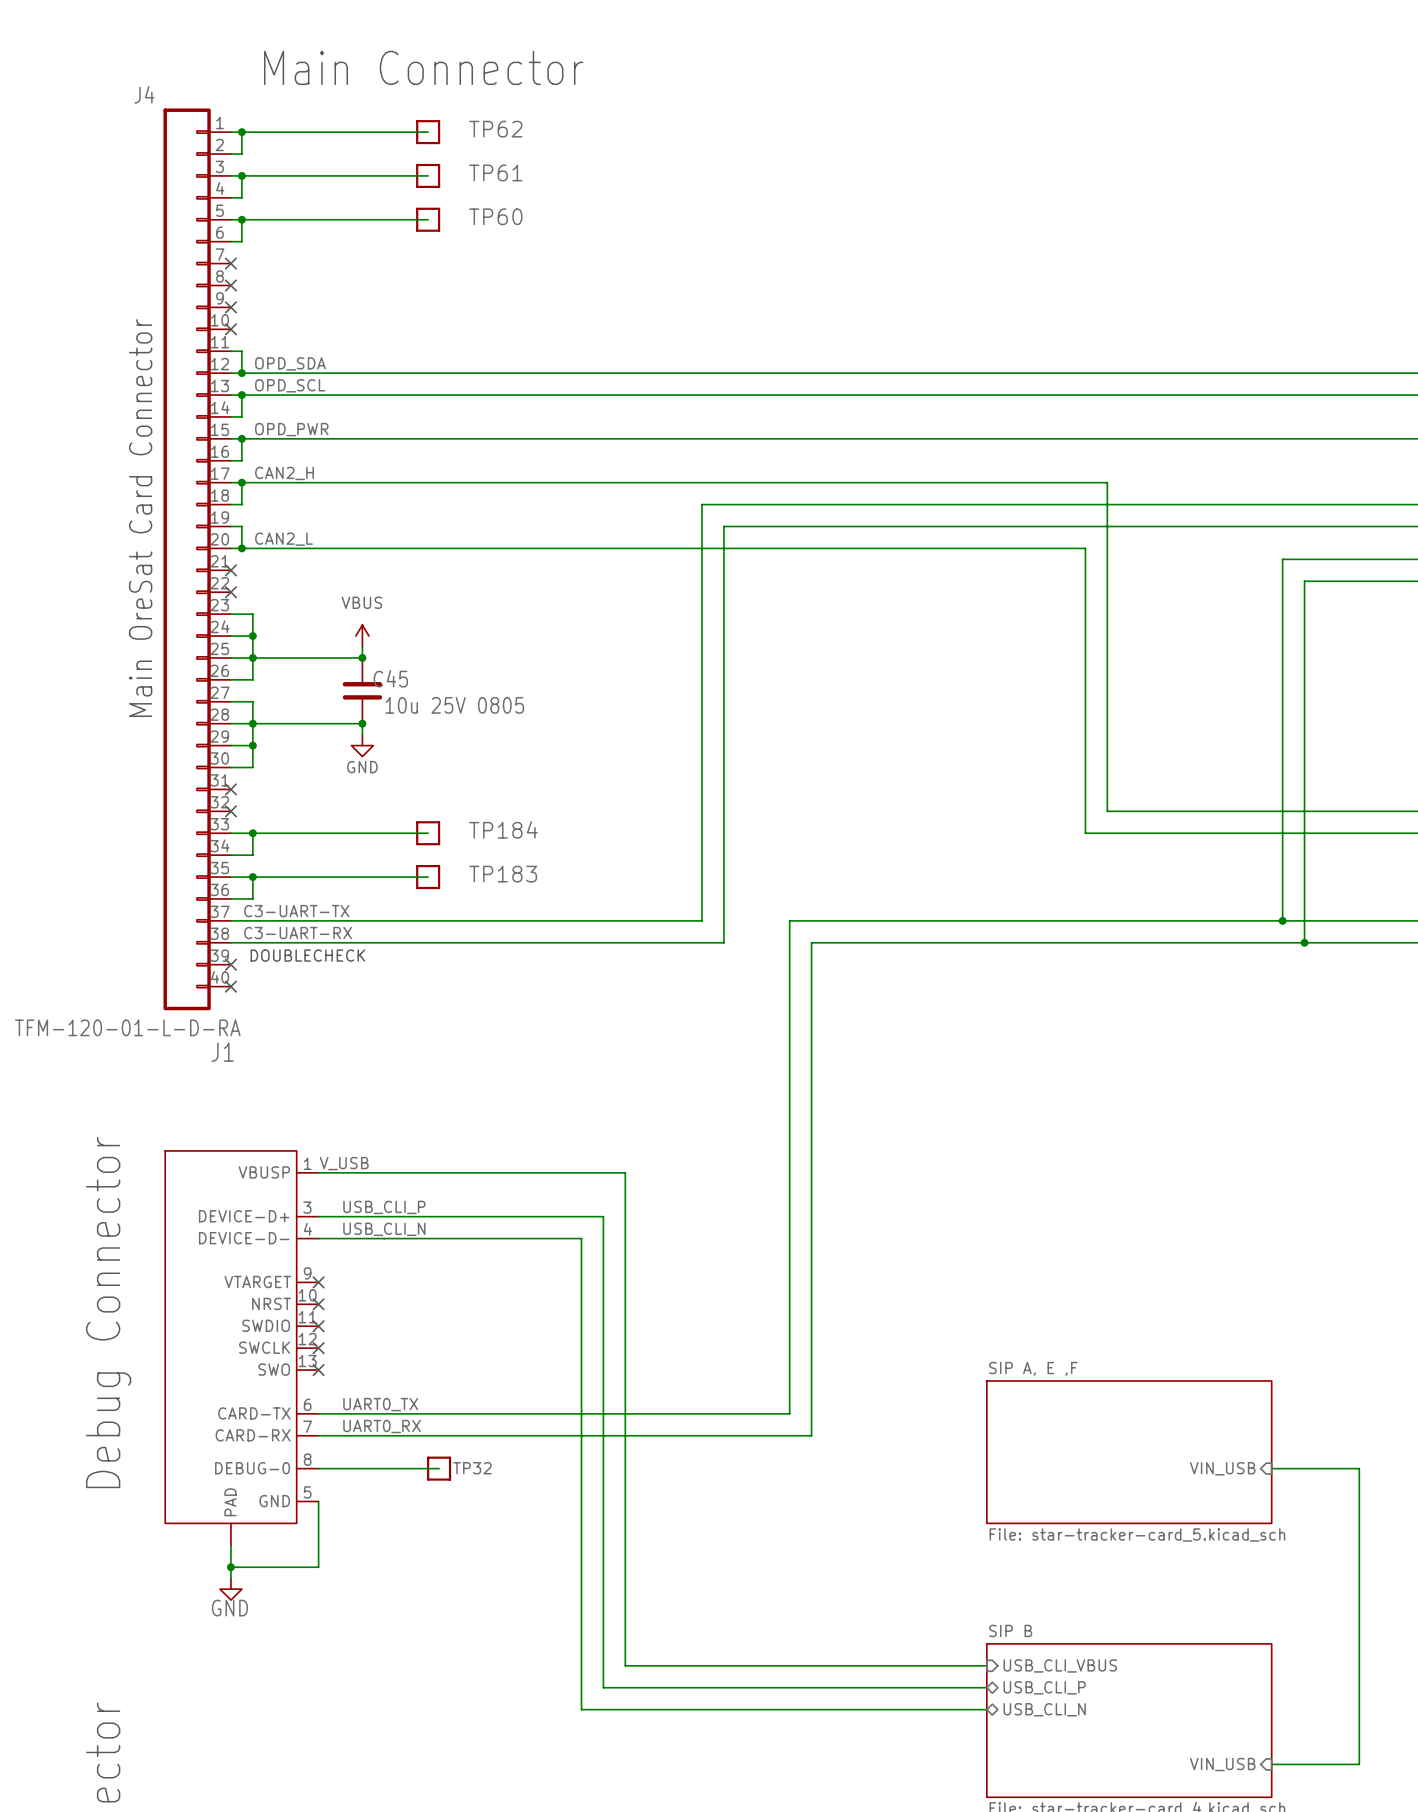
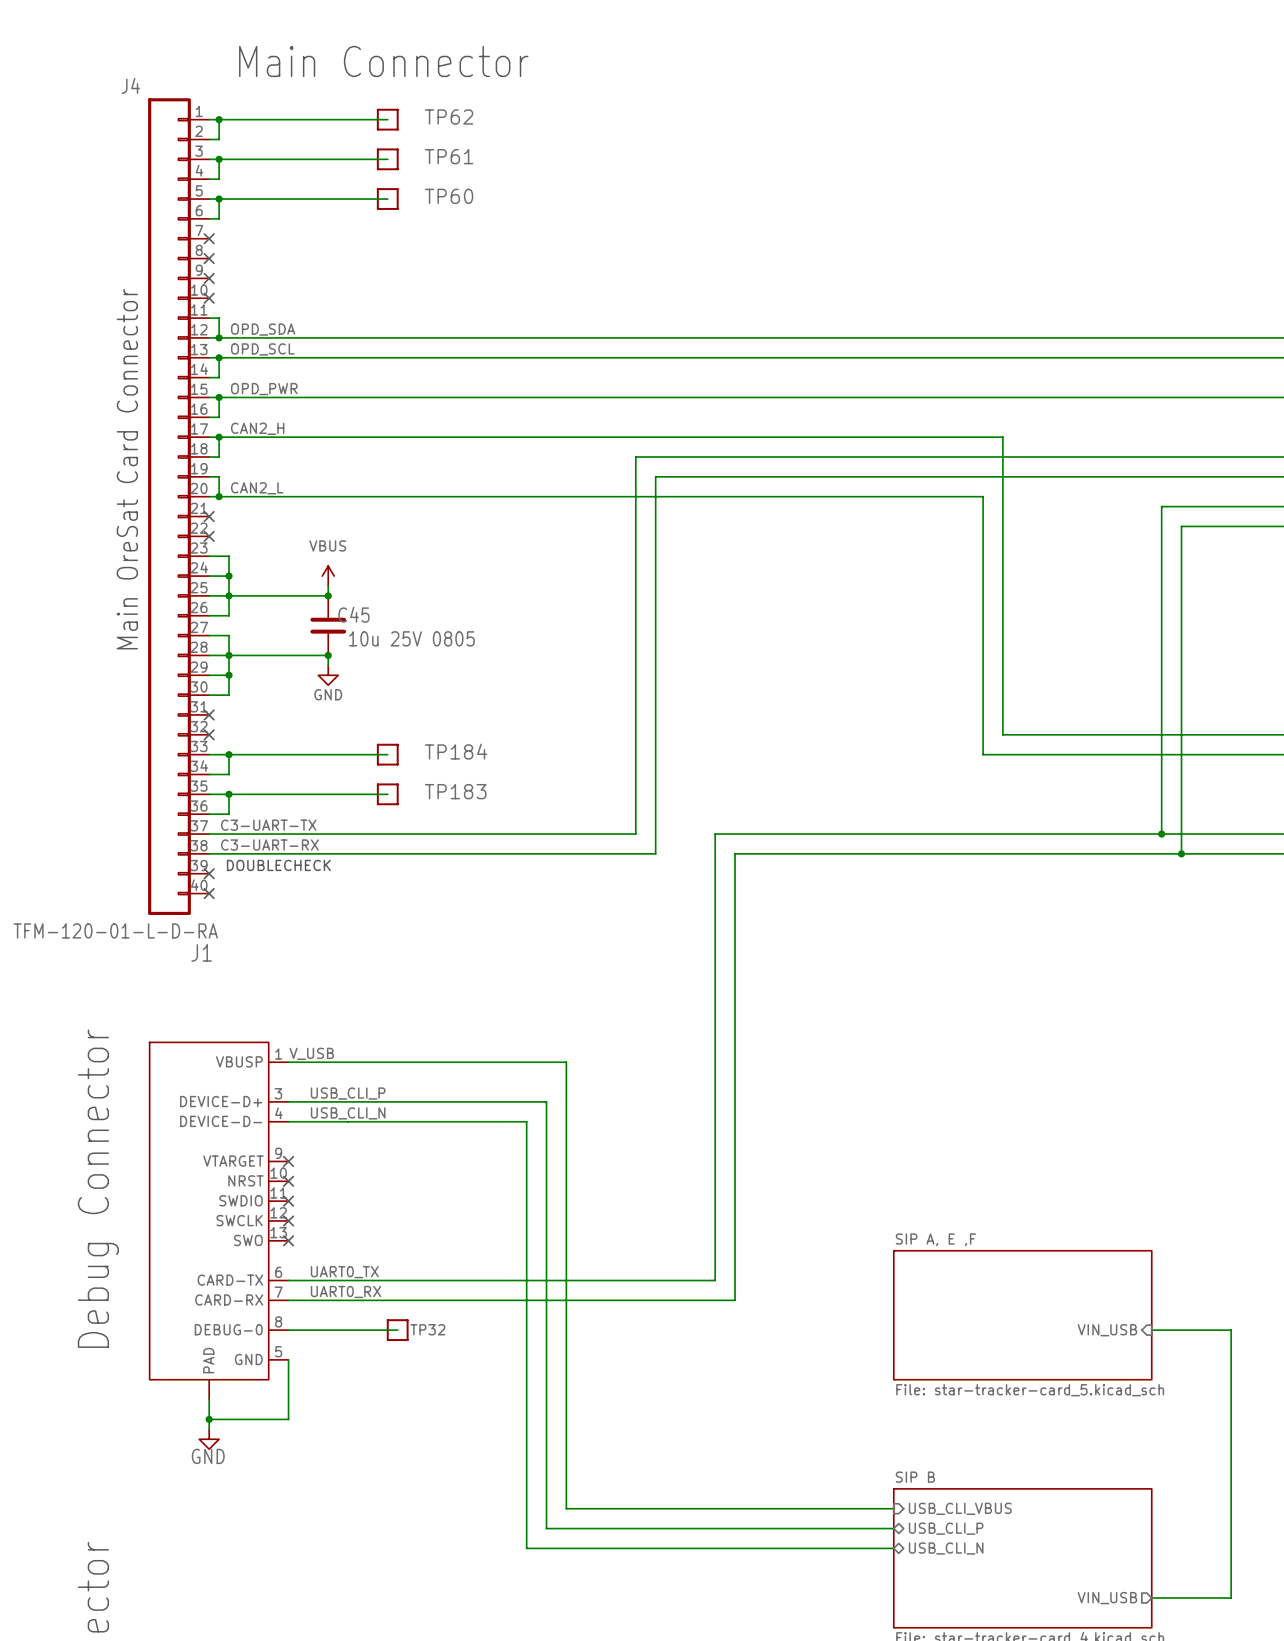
sheet pin shape: input (1222, 1764) -> output (1107, 1598)

